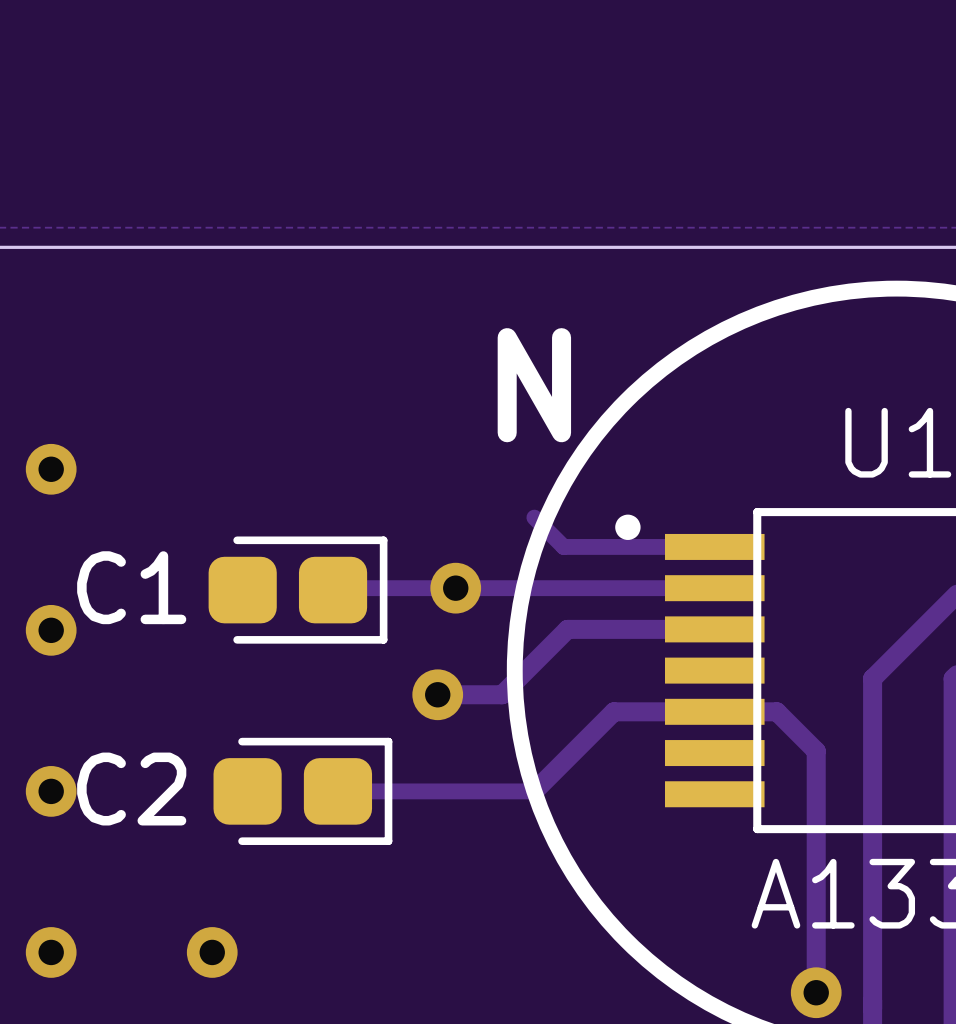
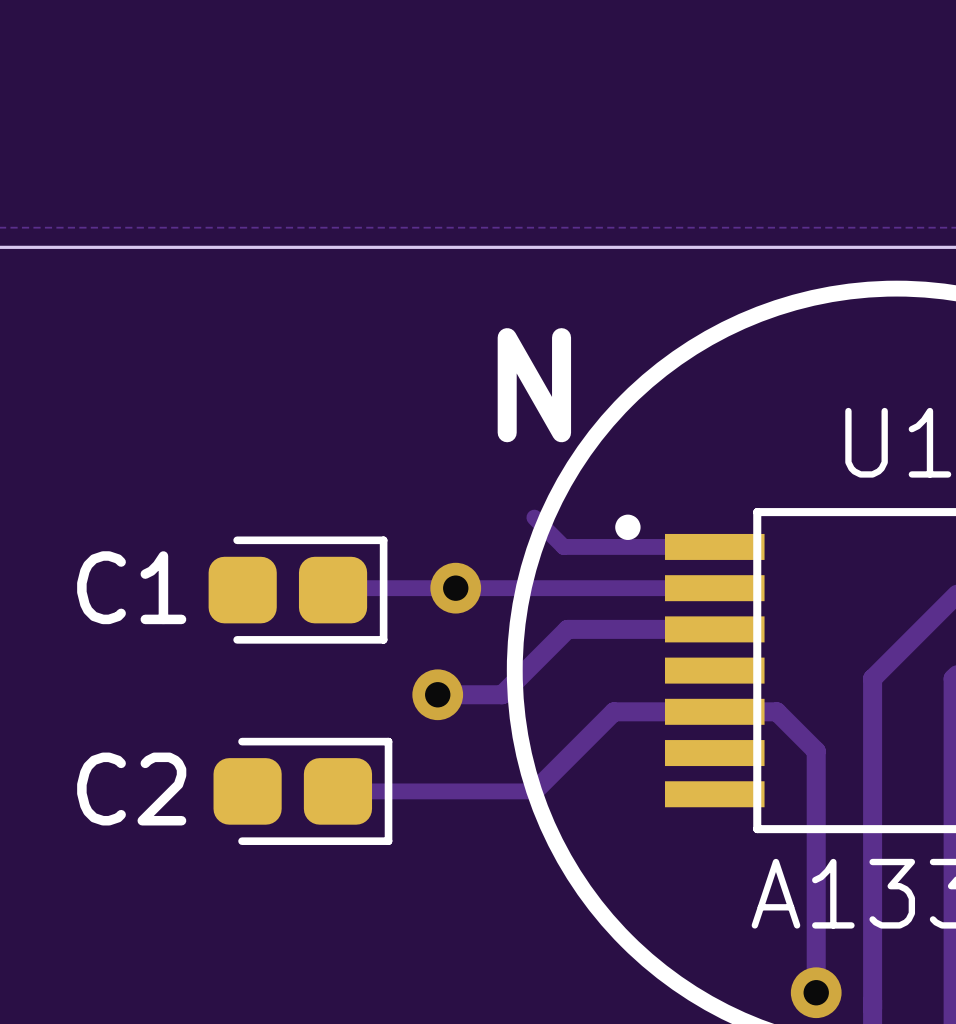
via: (51, 469) -> none
via: (51, 630) -> none
via: (51, 791) -> none
via: (51, 952) -> none
via: (212, 952) -> none

